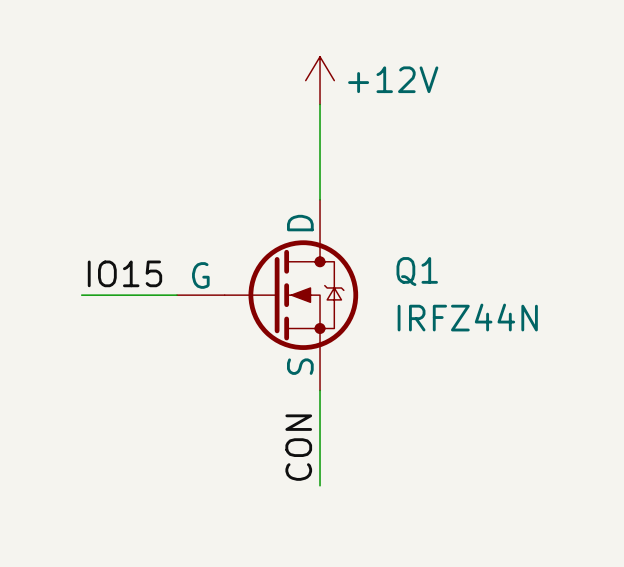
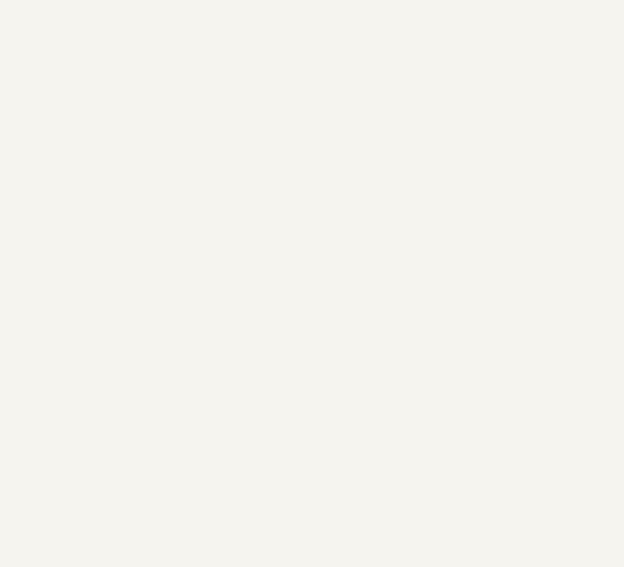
power symbol: +12V (320, 80) -> none
wire: (320, 104) (320, 199) -> none
label: IO15 (124, 273) -> none
wire: (81, 295) (177, 295) -> none
Q1: IRFZ44N (267, 295) -> none
wire: (320, 390) (320, 485) -> none
label: CON (298, 447) -> none

